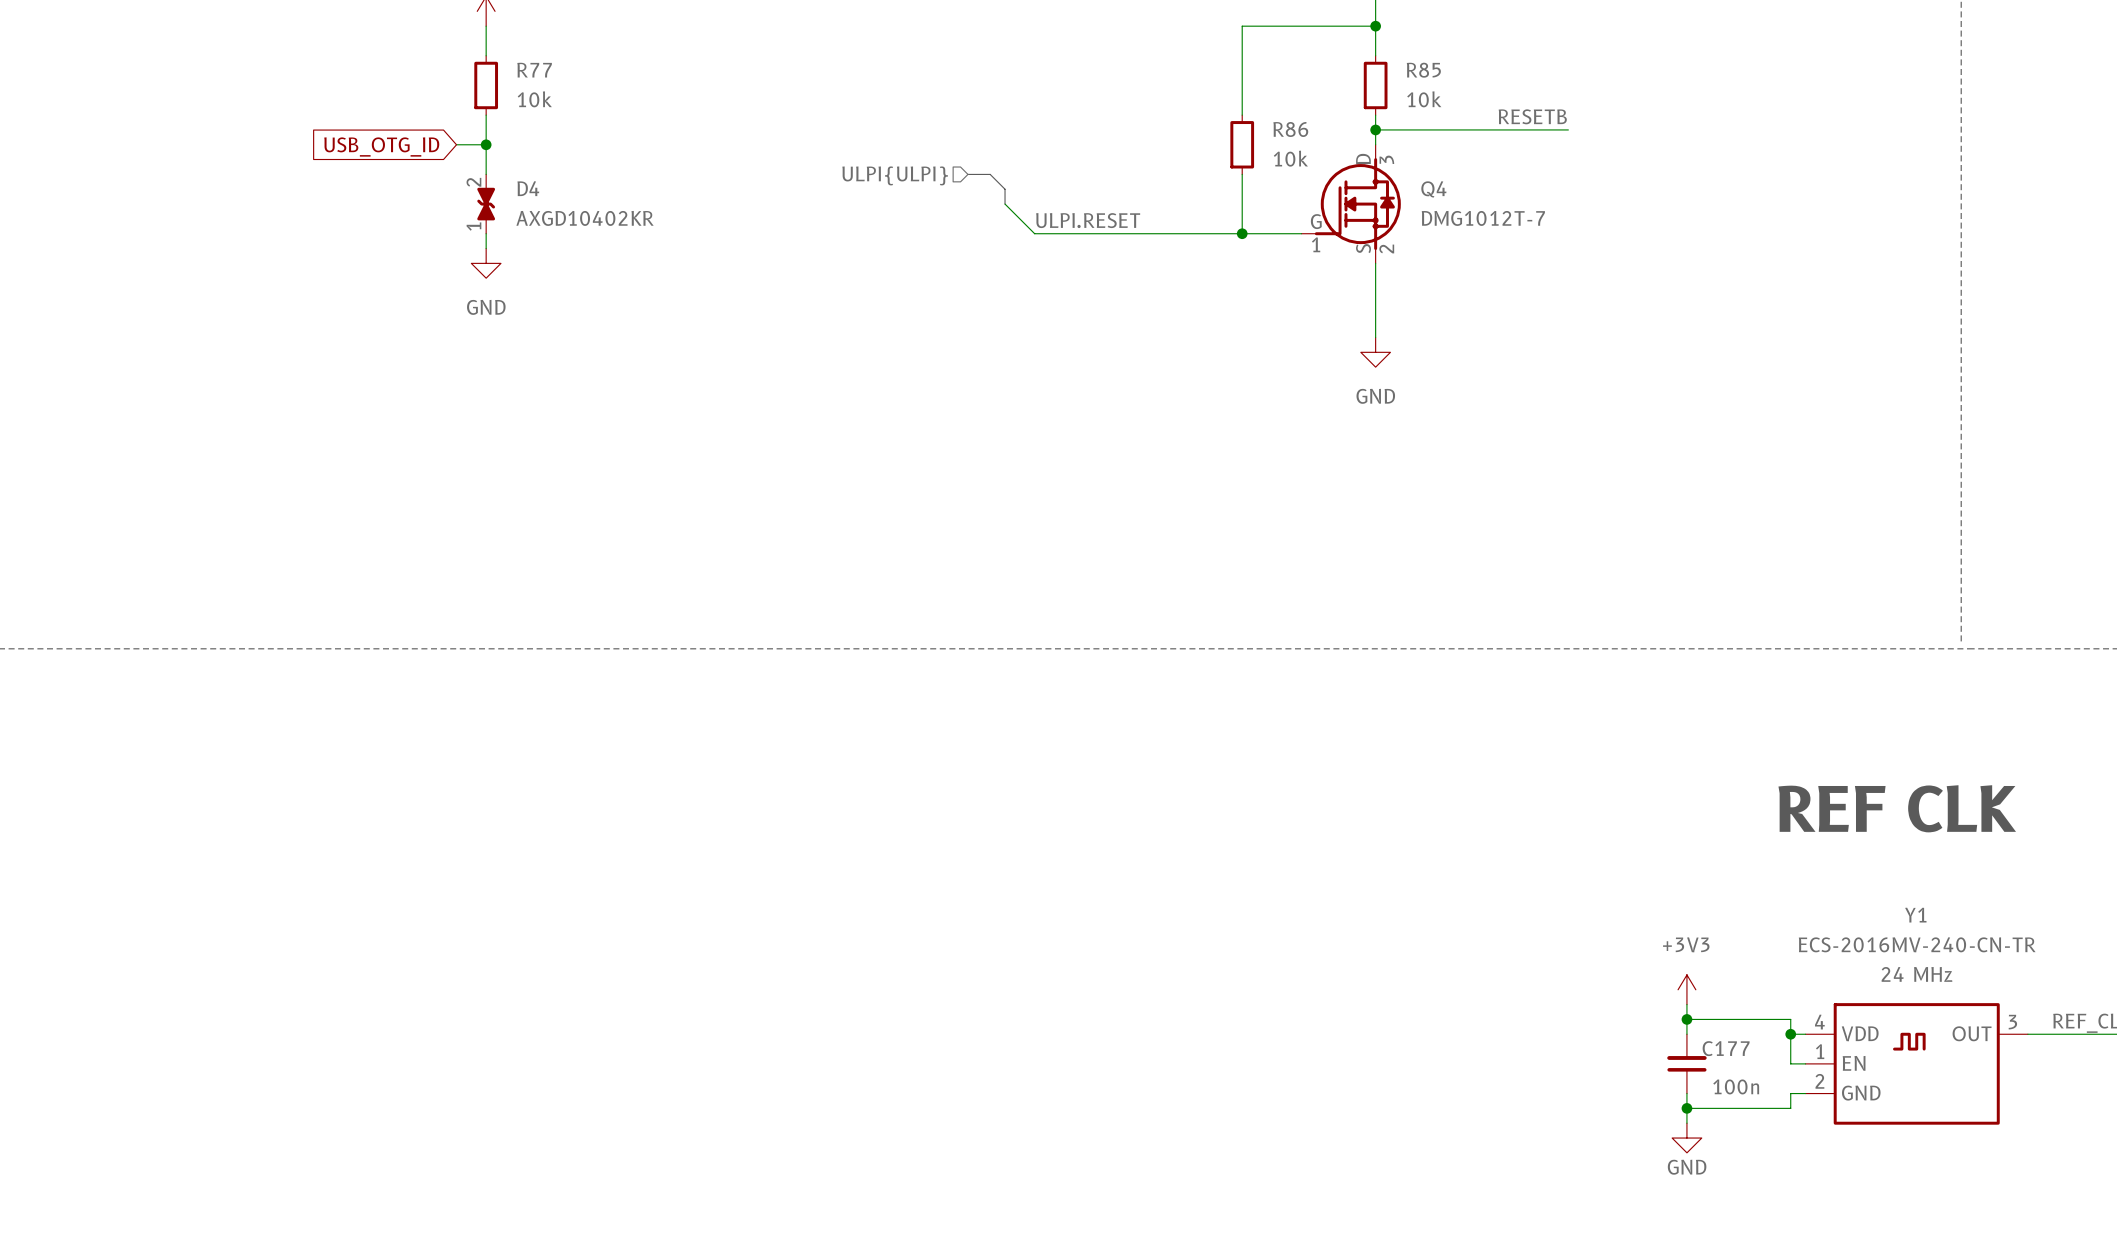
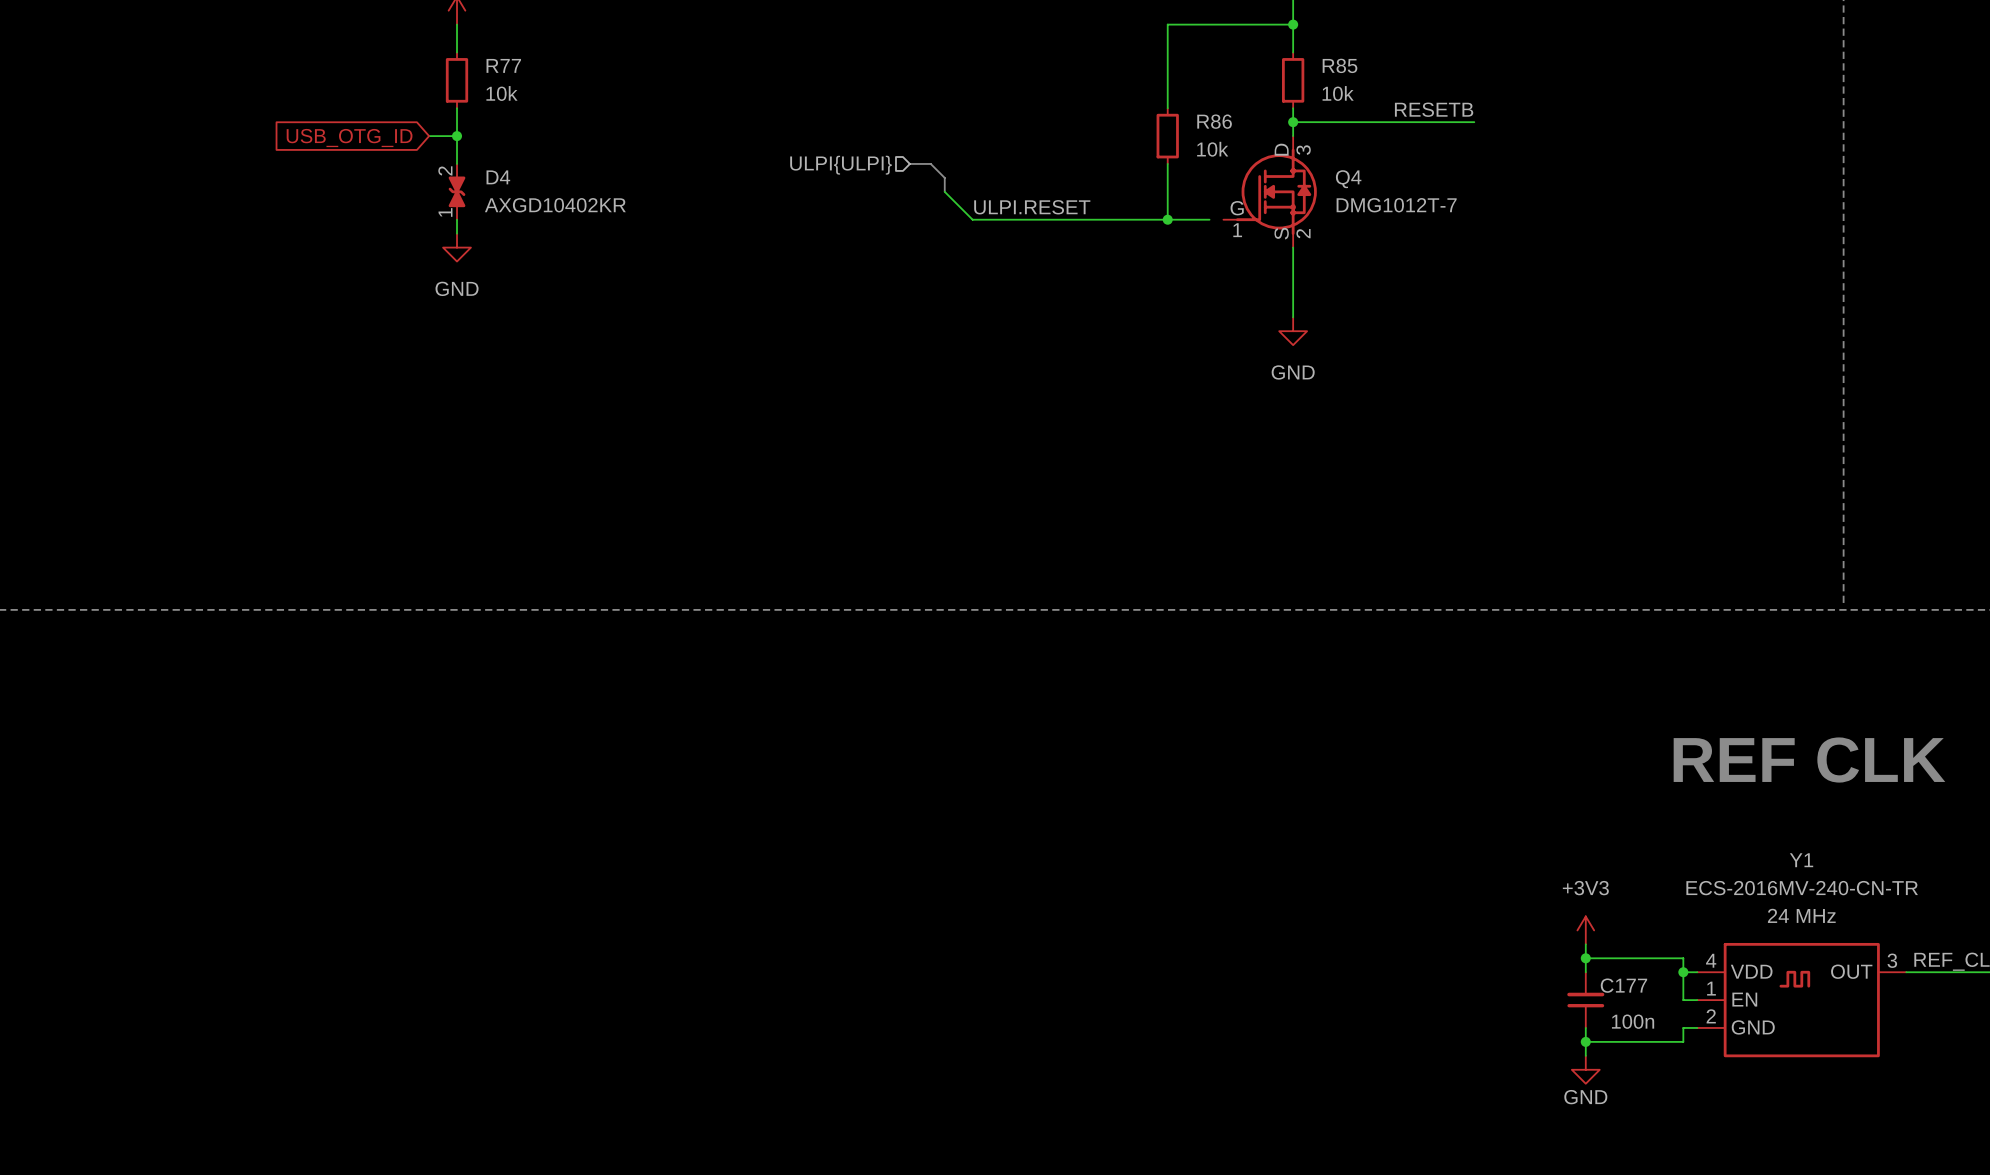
wire: (1286, 233) (1301, 233) -> none

